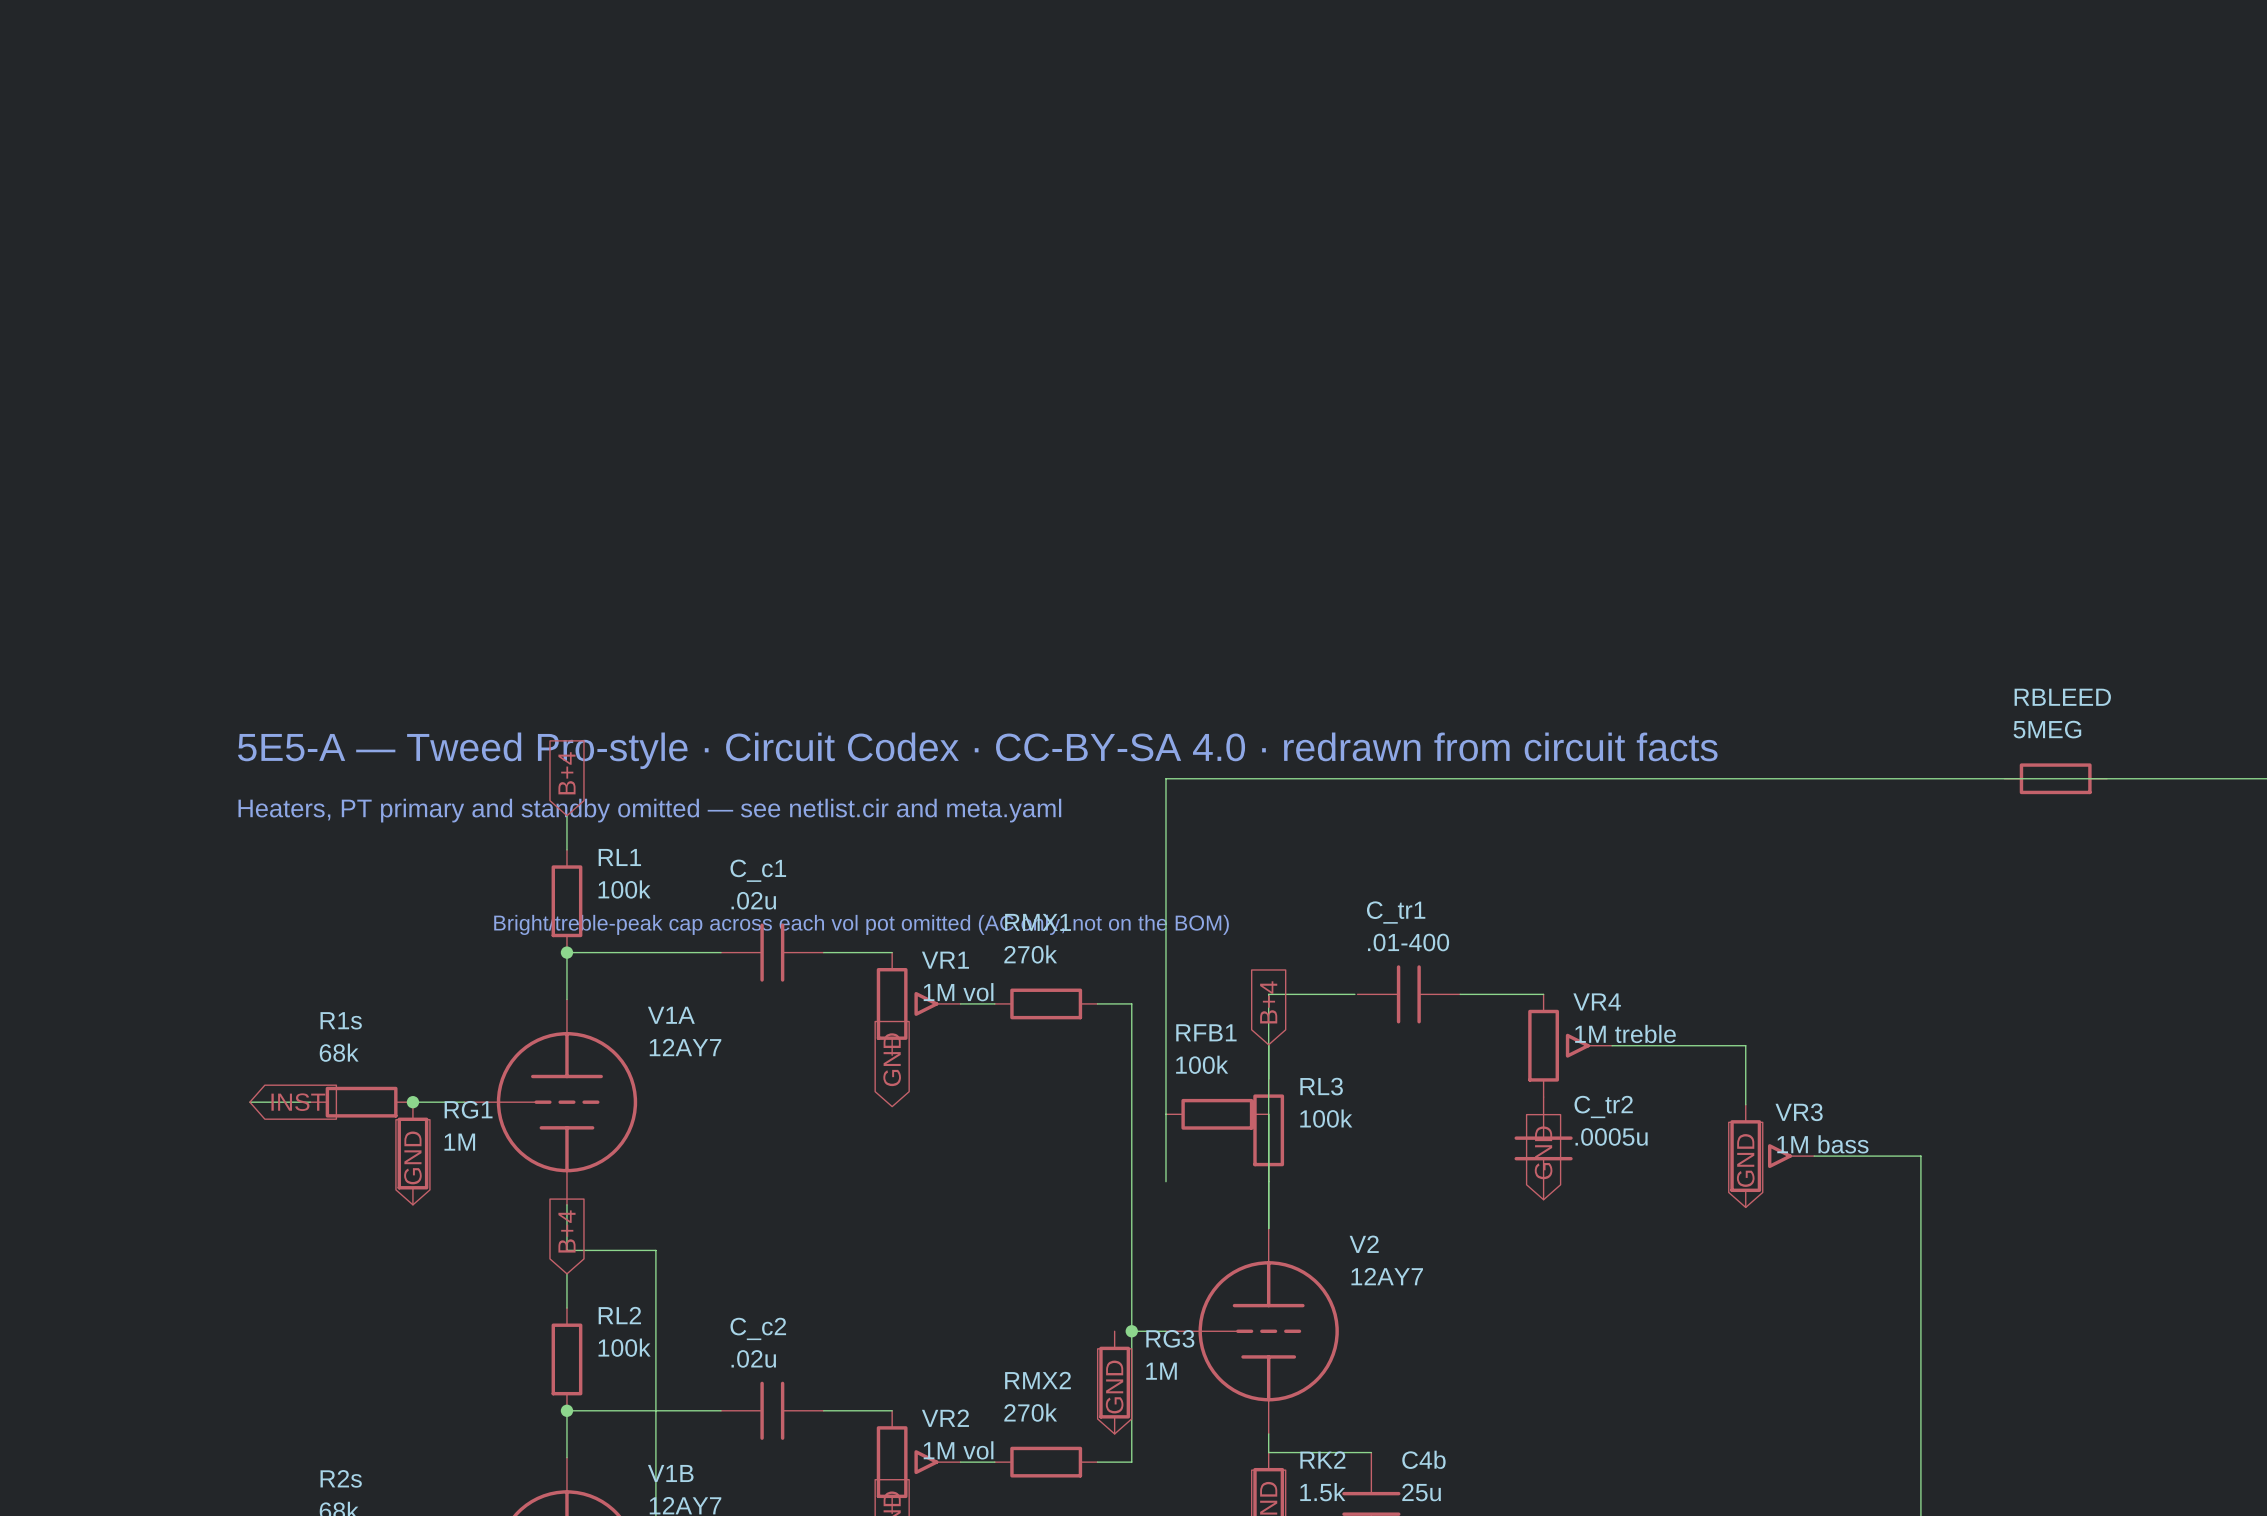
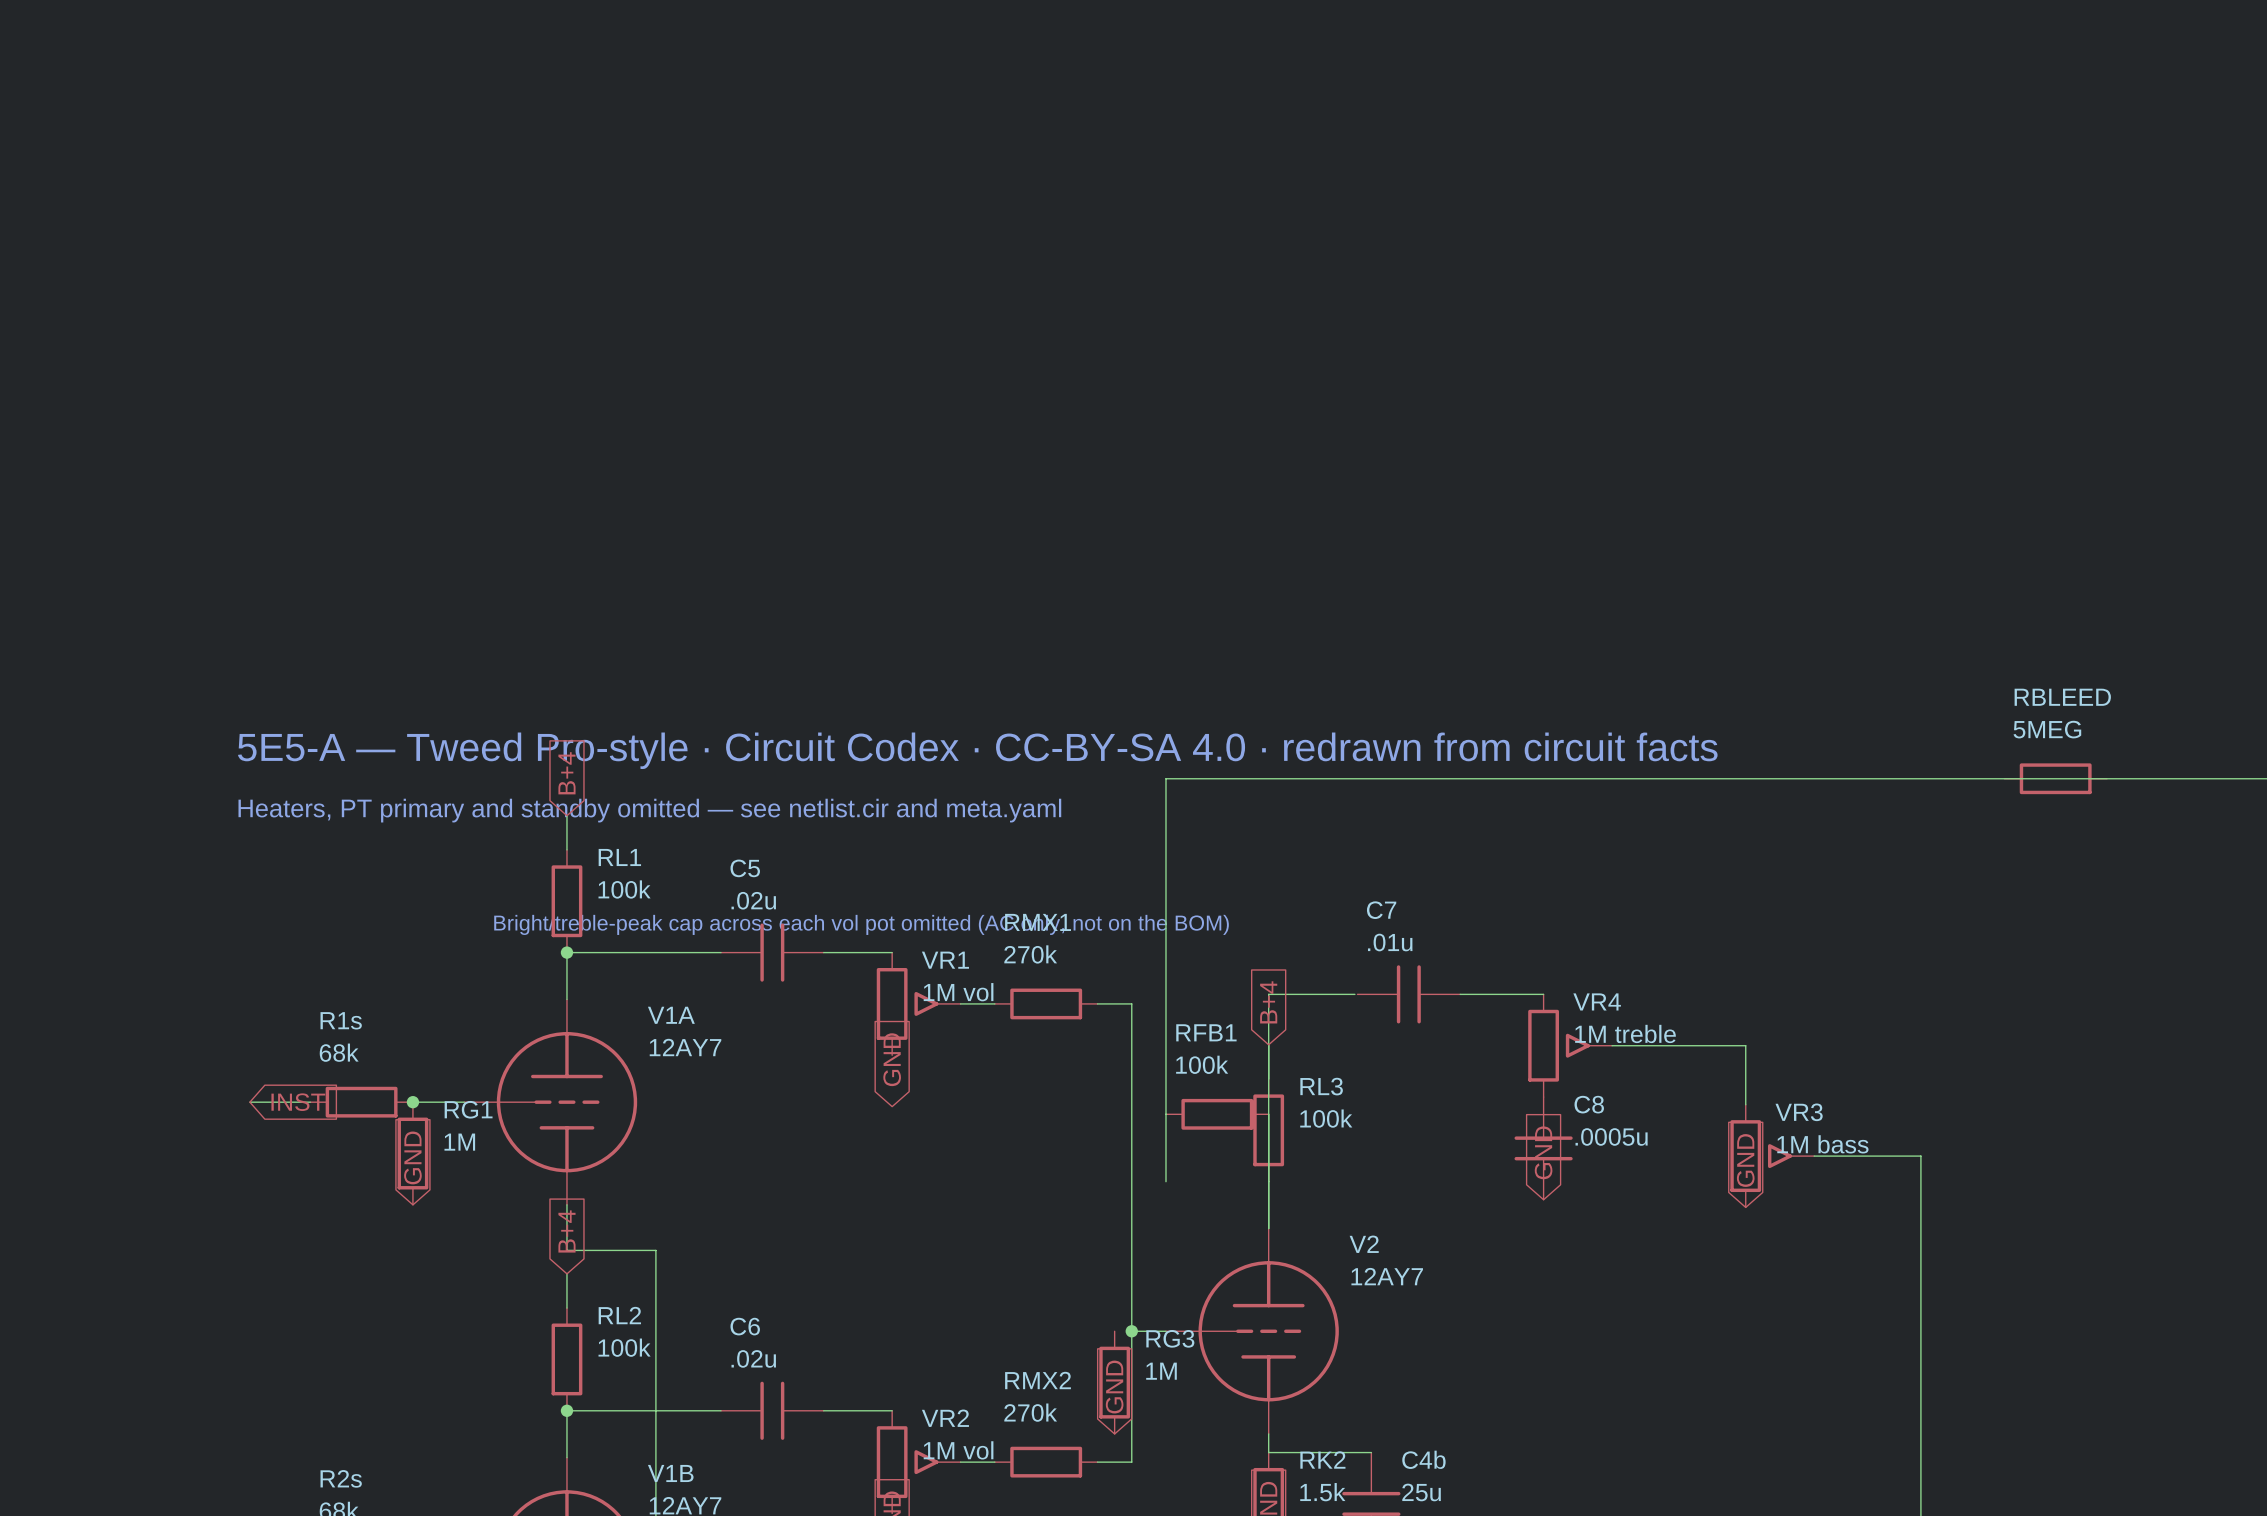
C_c1 name: C_c1 (758, 870) -> C5 (745, 868)
C_tr1 name: C_tr1 (1396, 912) -> C7 (1381, 910)
C_tr1 value: .01-400 (1408, 942) -> .01u (1390, 942)
C_tr2 name: C_tr2 (1603, 1106) -> C8 (1589, 1104)
C_c2 name: C_c2 (758, 1328) -> C6 (745, 1326)

